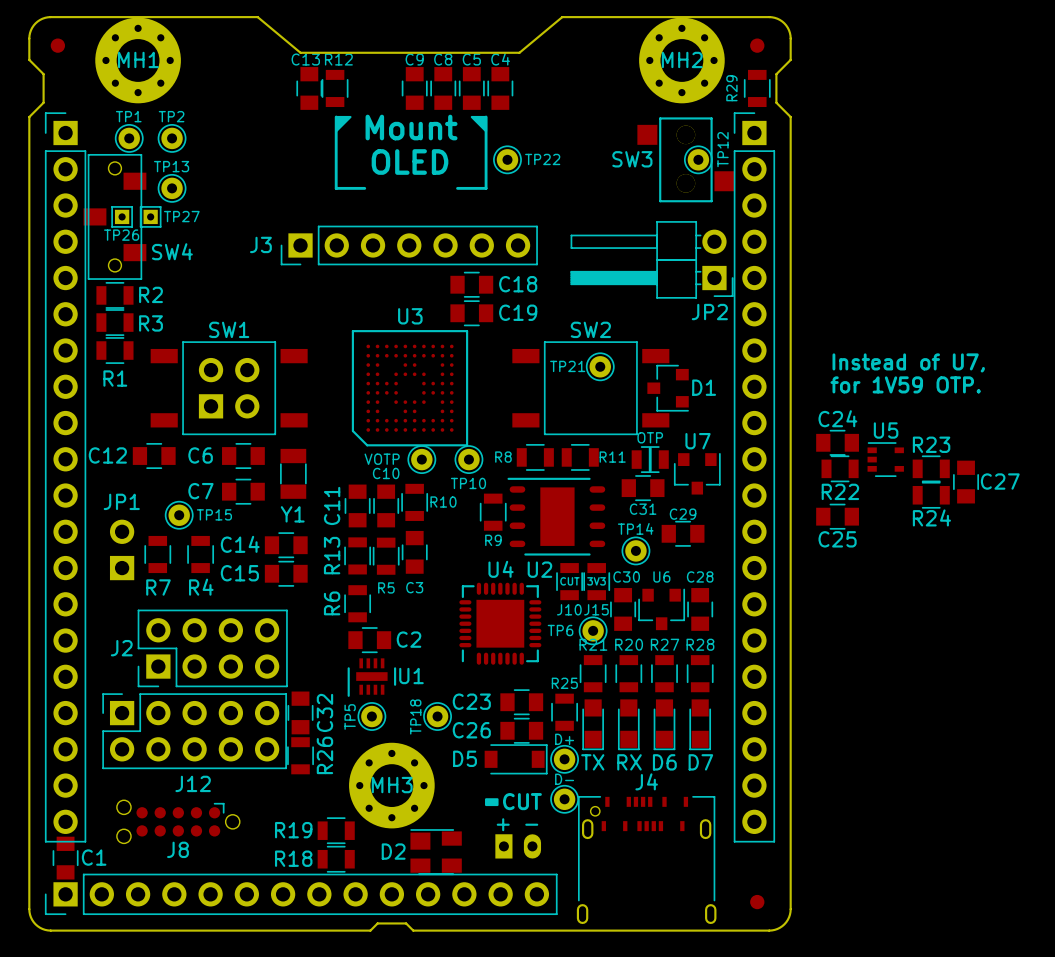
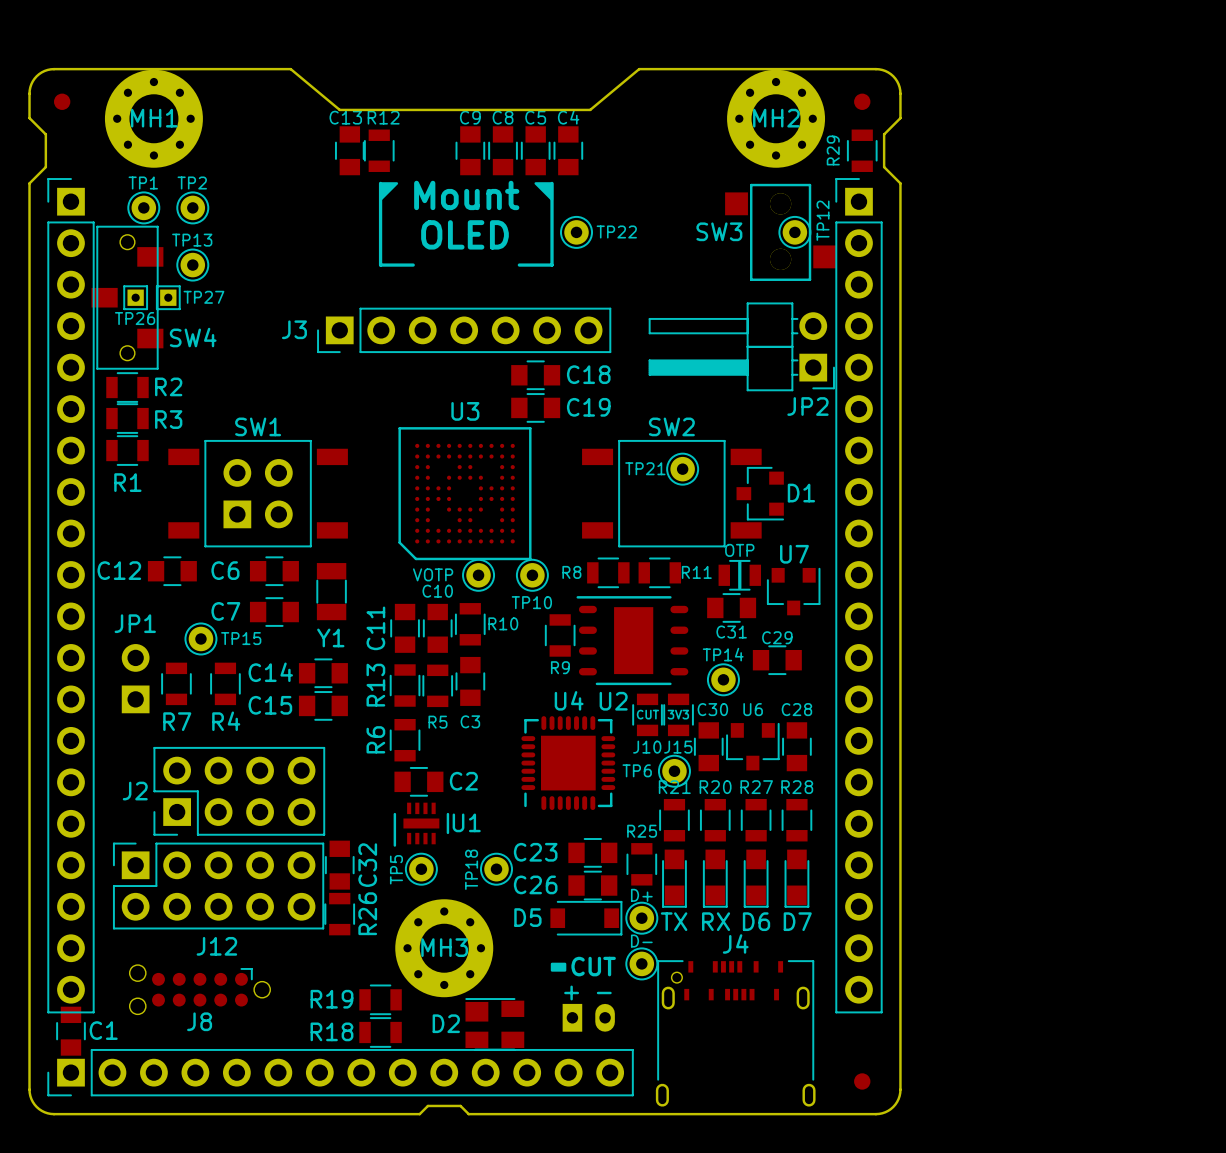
text: Instead of U7, (908, 362) -> none
text: for 1V59 OTP. (905, 384) -> none
C24: (837, 442) -> none
U5: (885, 459) -> none
R22: (840, 468) -> none
R23: (931, 468) -> none
C27: (966, 482) -> none
R24: (931, 495) -> none
C25: (837, 516) -> none

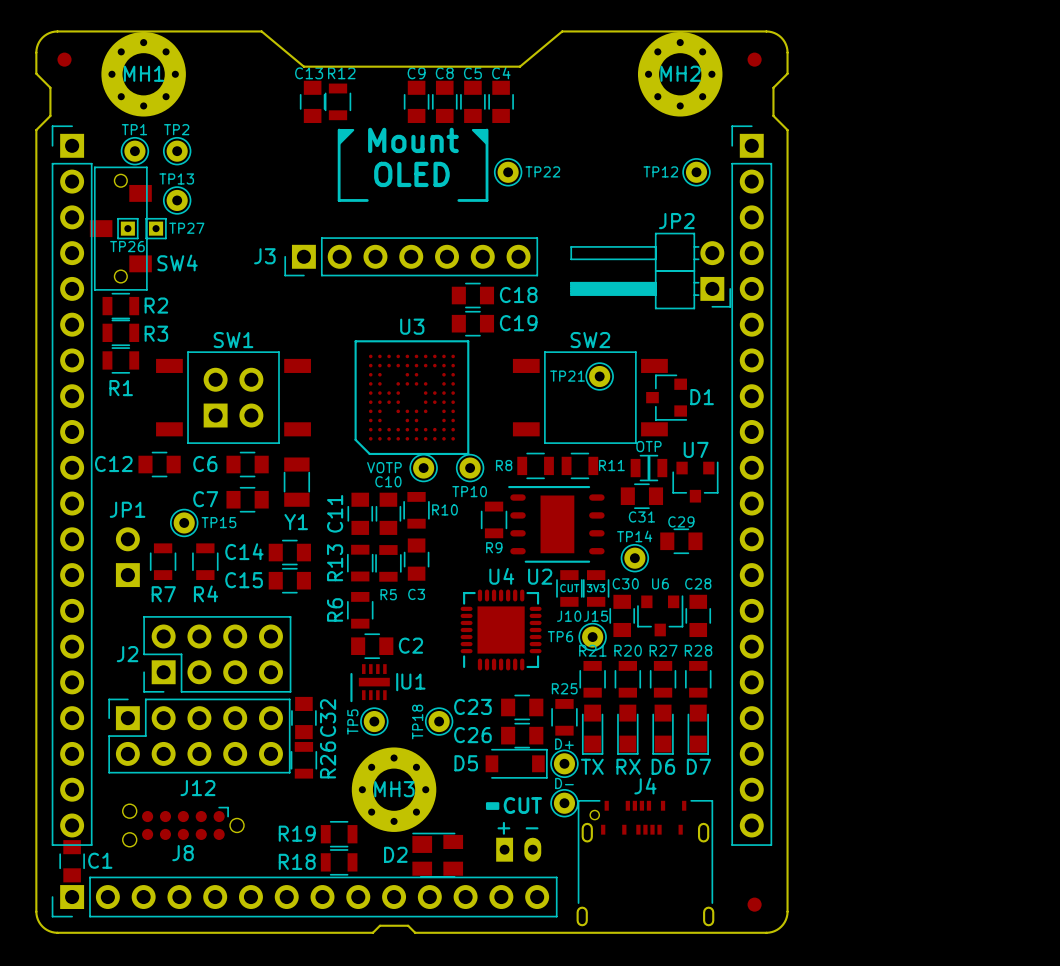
R29: (862, 150) -> none
TP12 name rotation: 0° (823, 220) -> 90° clockwise (660, 171)
TP12 name position: TP12 (823, 220) -> TP12 (660, 171)
SW3: (780, 232) -> none
JP2 name position: JP2 (807, 406) -> JP2 (676, 221)

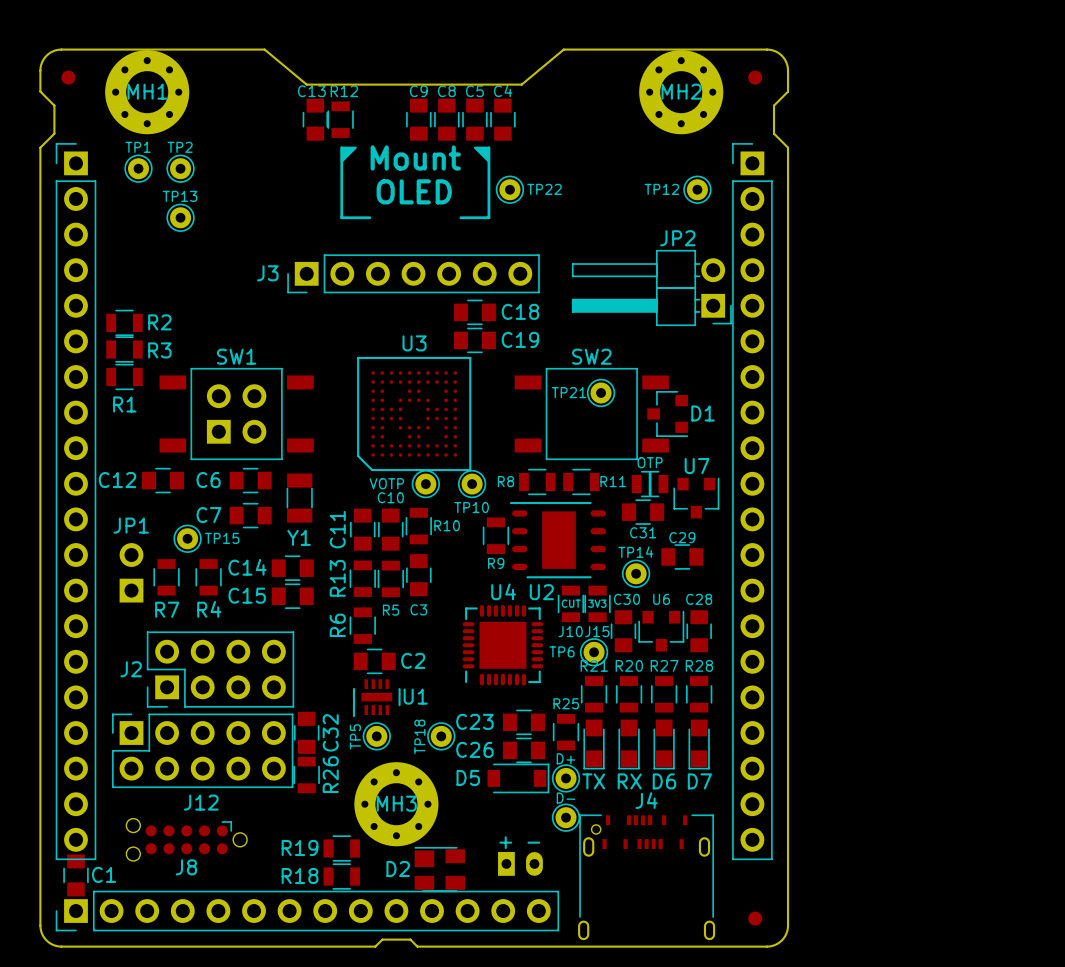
SW4: (120, 228) -> none
TP26: (127, 228) -> none
TP27: (156, 228) -> none
drawing: [485, 802, 500, 810] -> none
text: CUT (522, 805) -> none

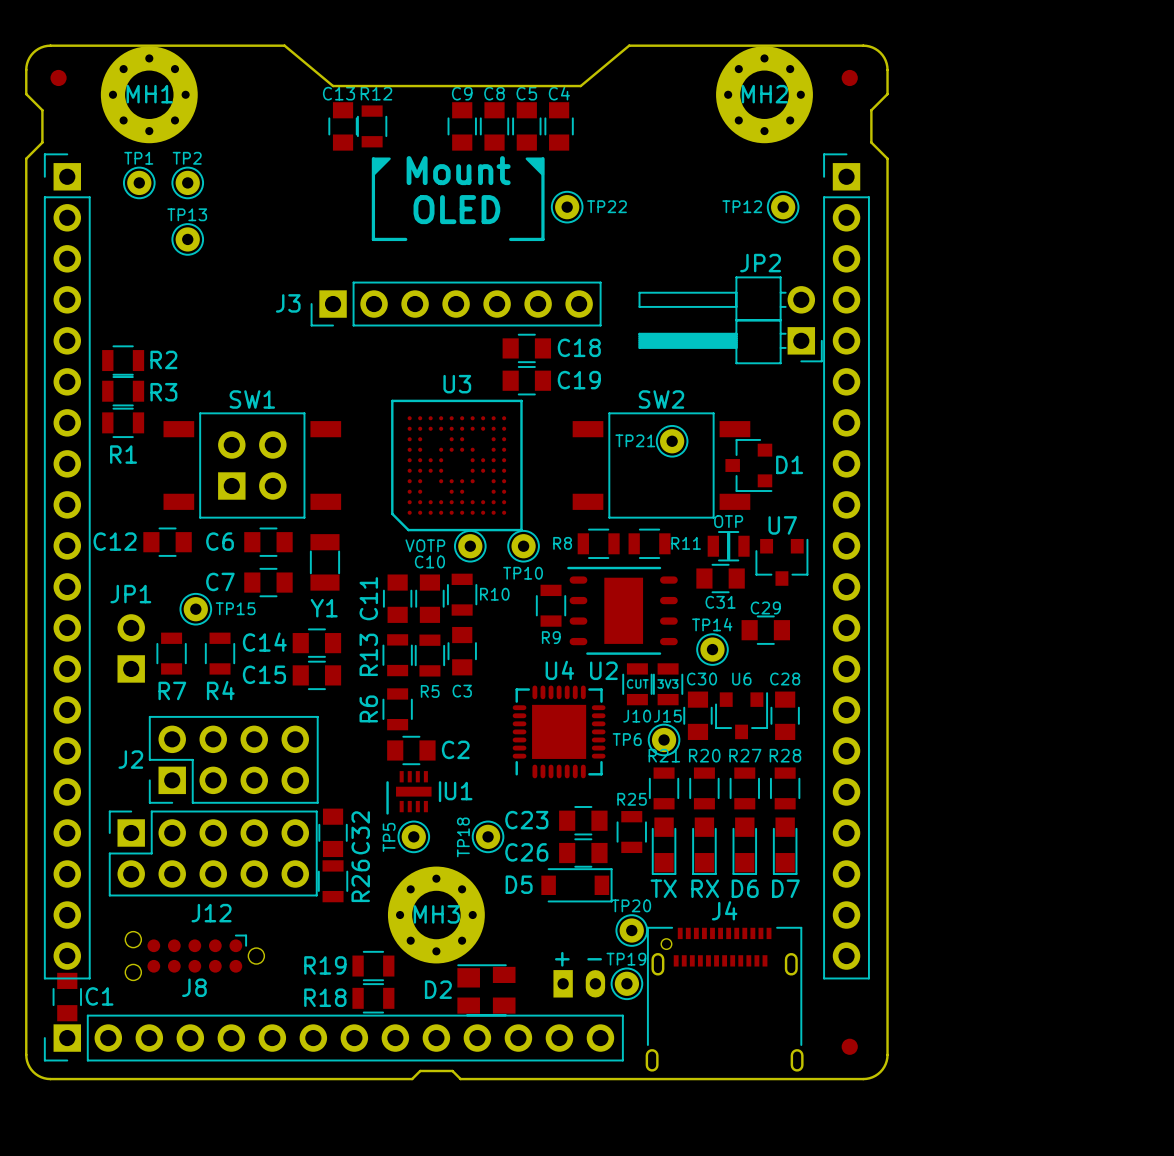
D+: (566, 778) -> none
D- name: D- (566, 798) -> TP20 (631, 905)
J4 footprint: [578, 814, 716, 941] -> [645, 926, 804, 1072]
TP19: none -> (626, 983)

